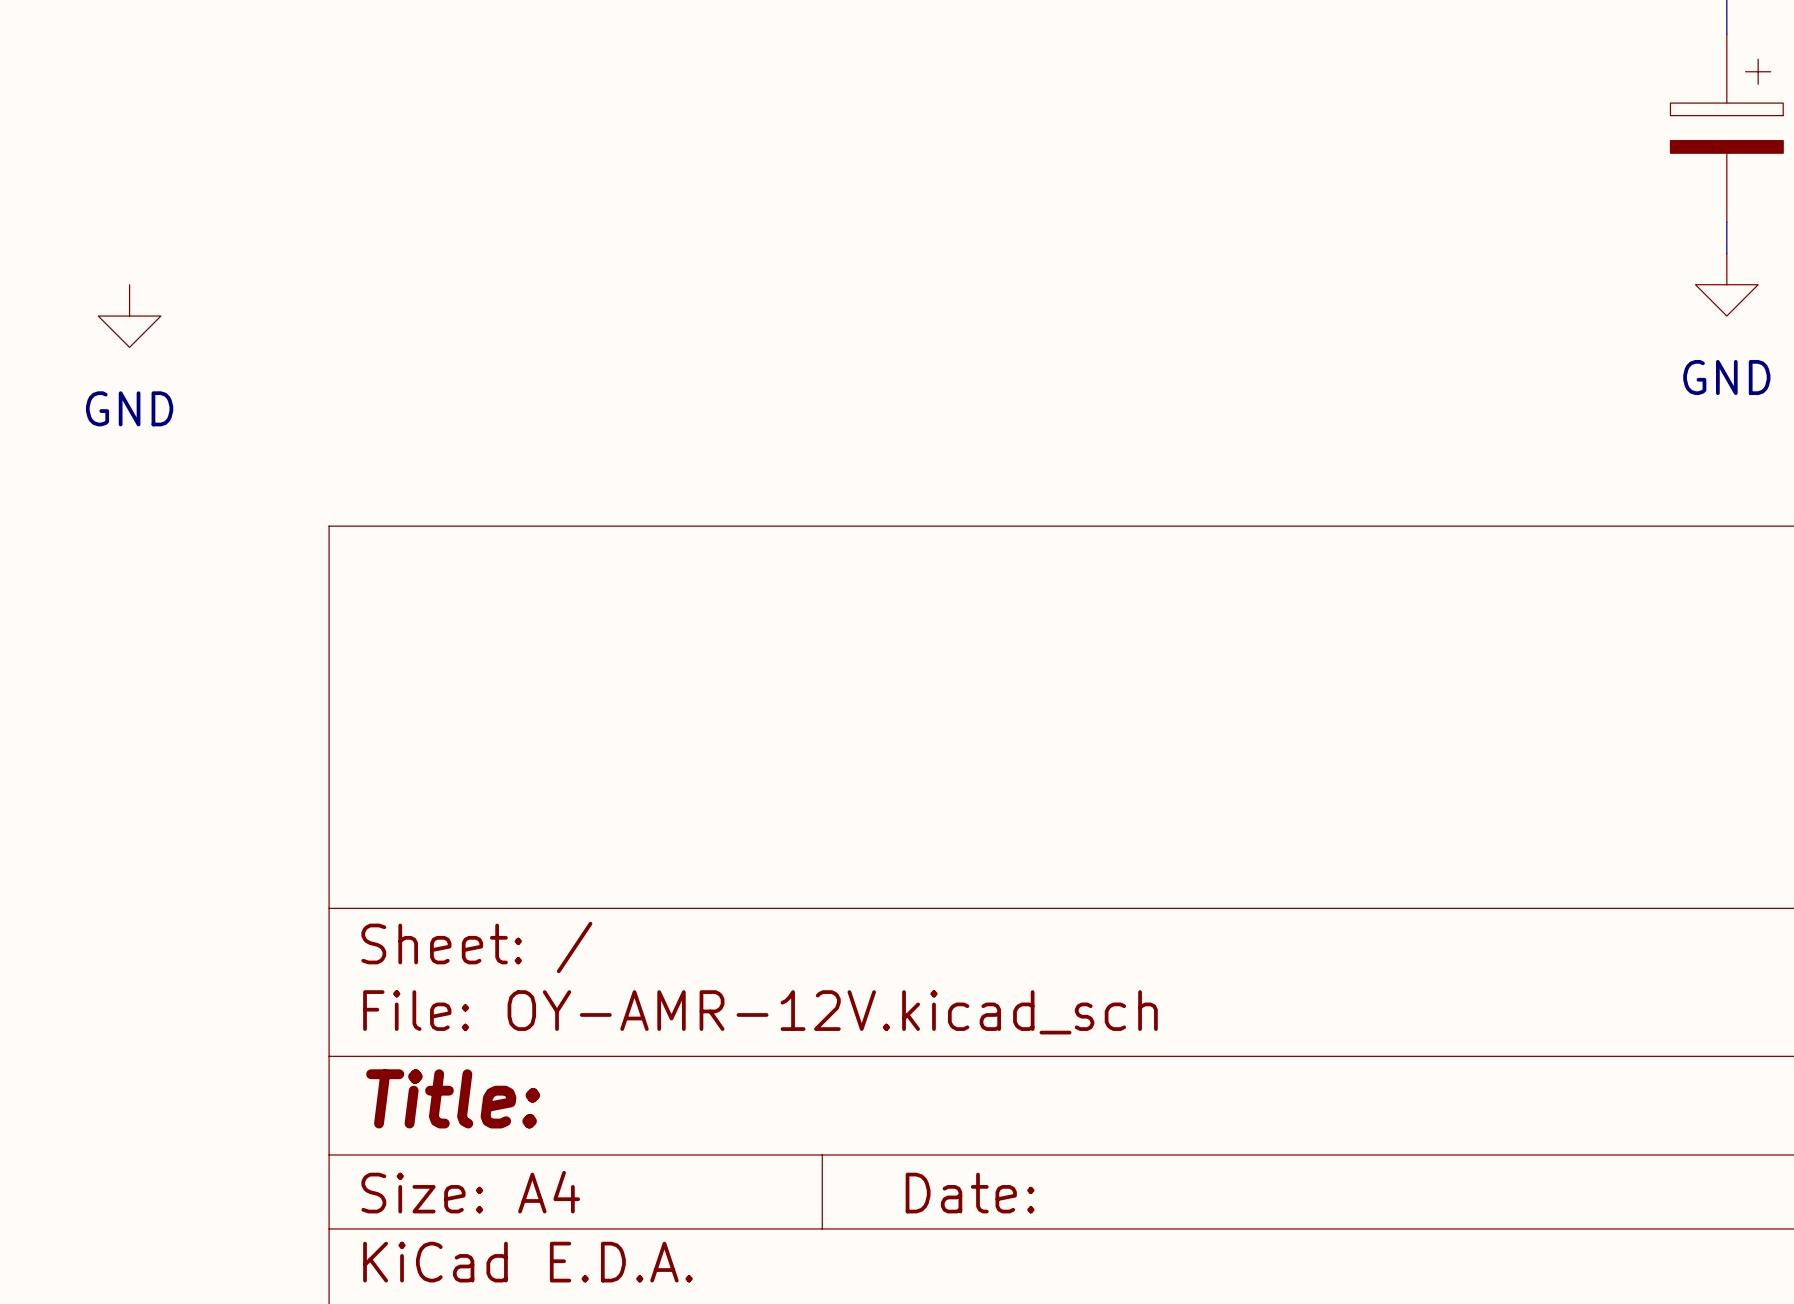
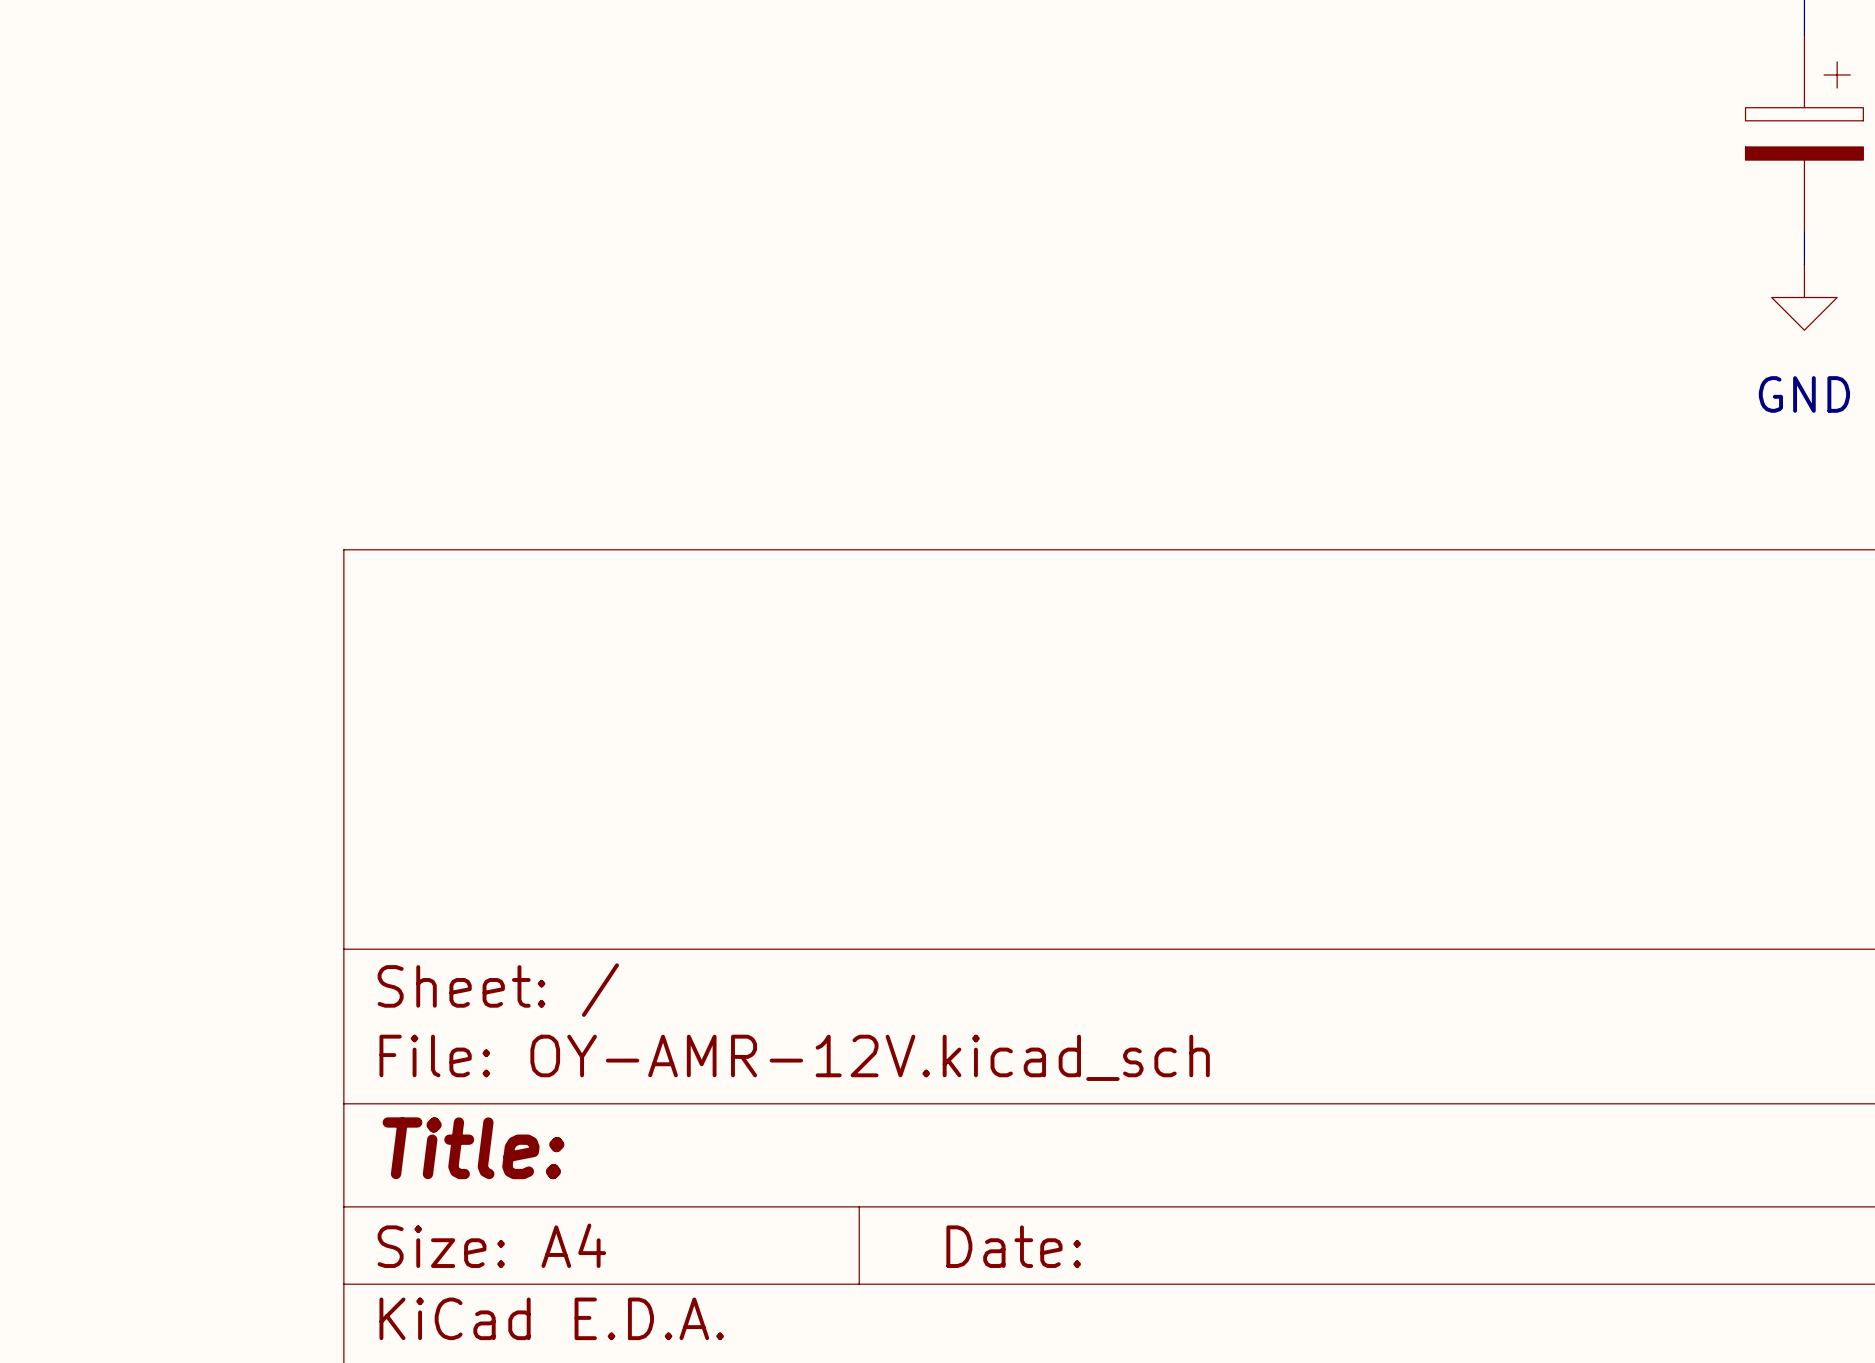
power symbol: GND (129, 316) -> none

